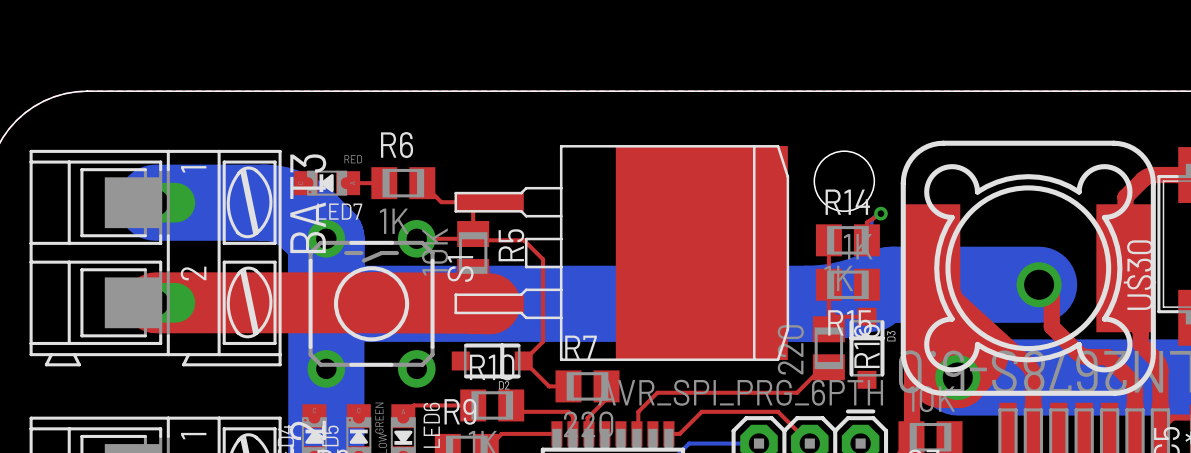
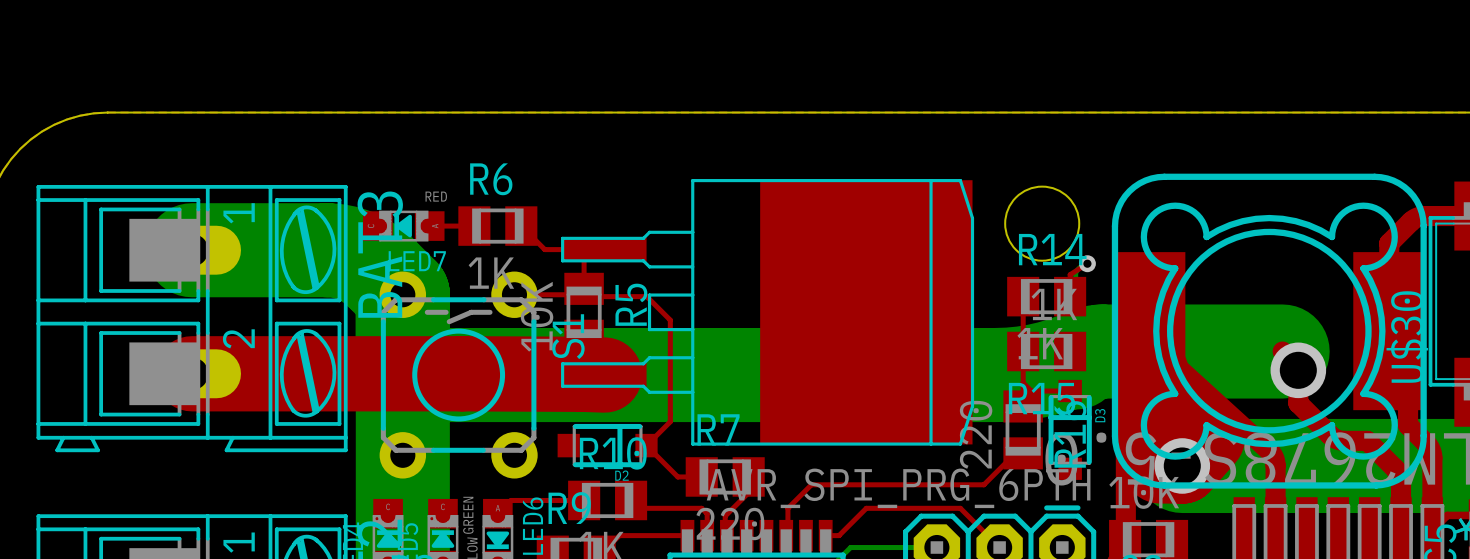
via position: (1039, 284) -> (1298, 370)

